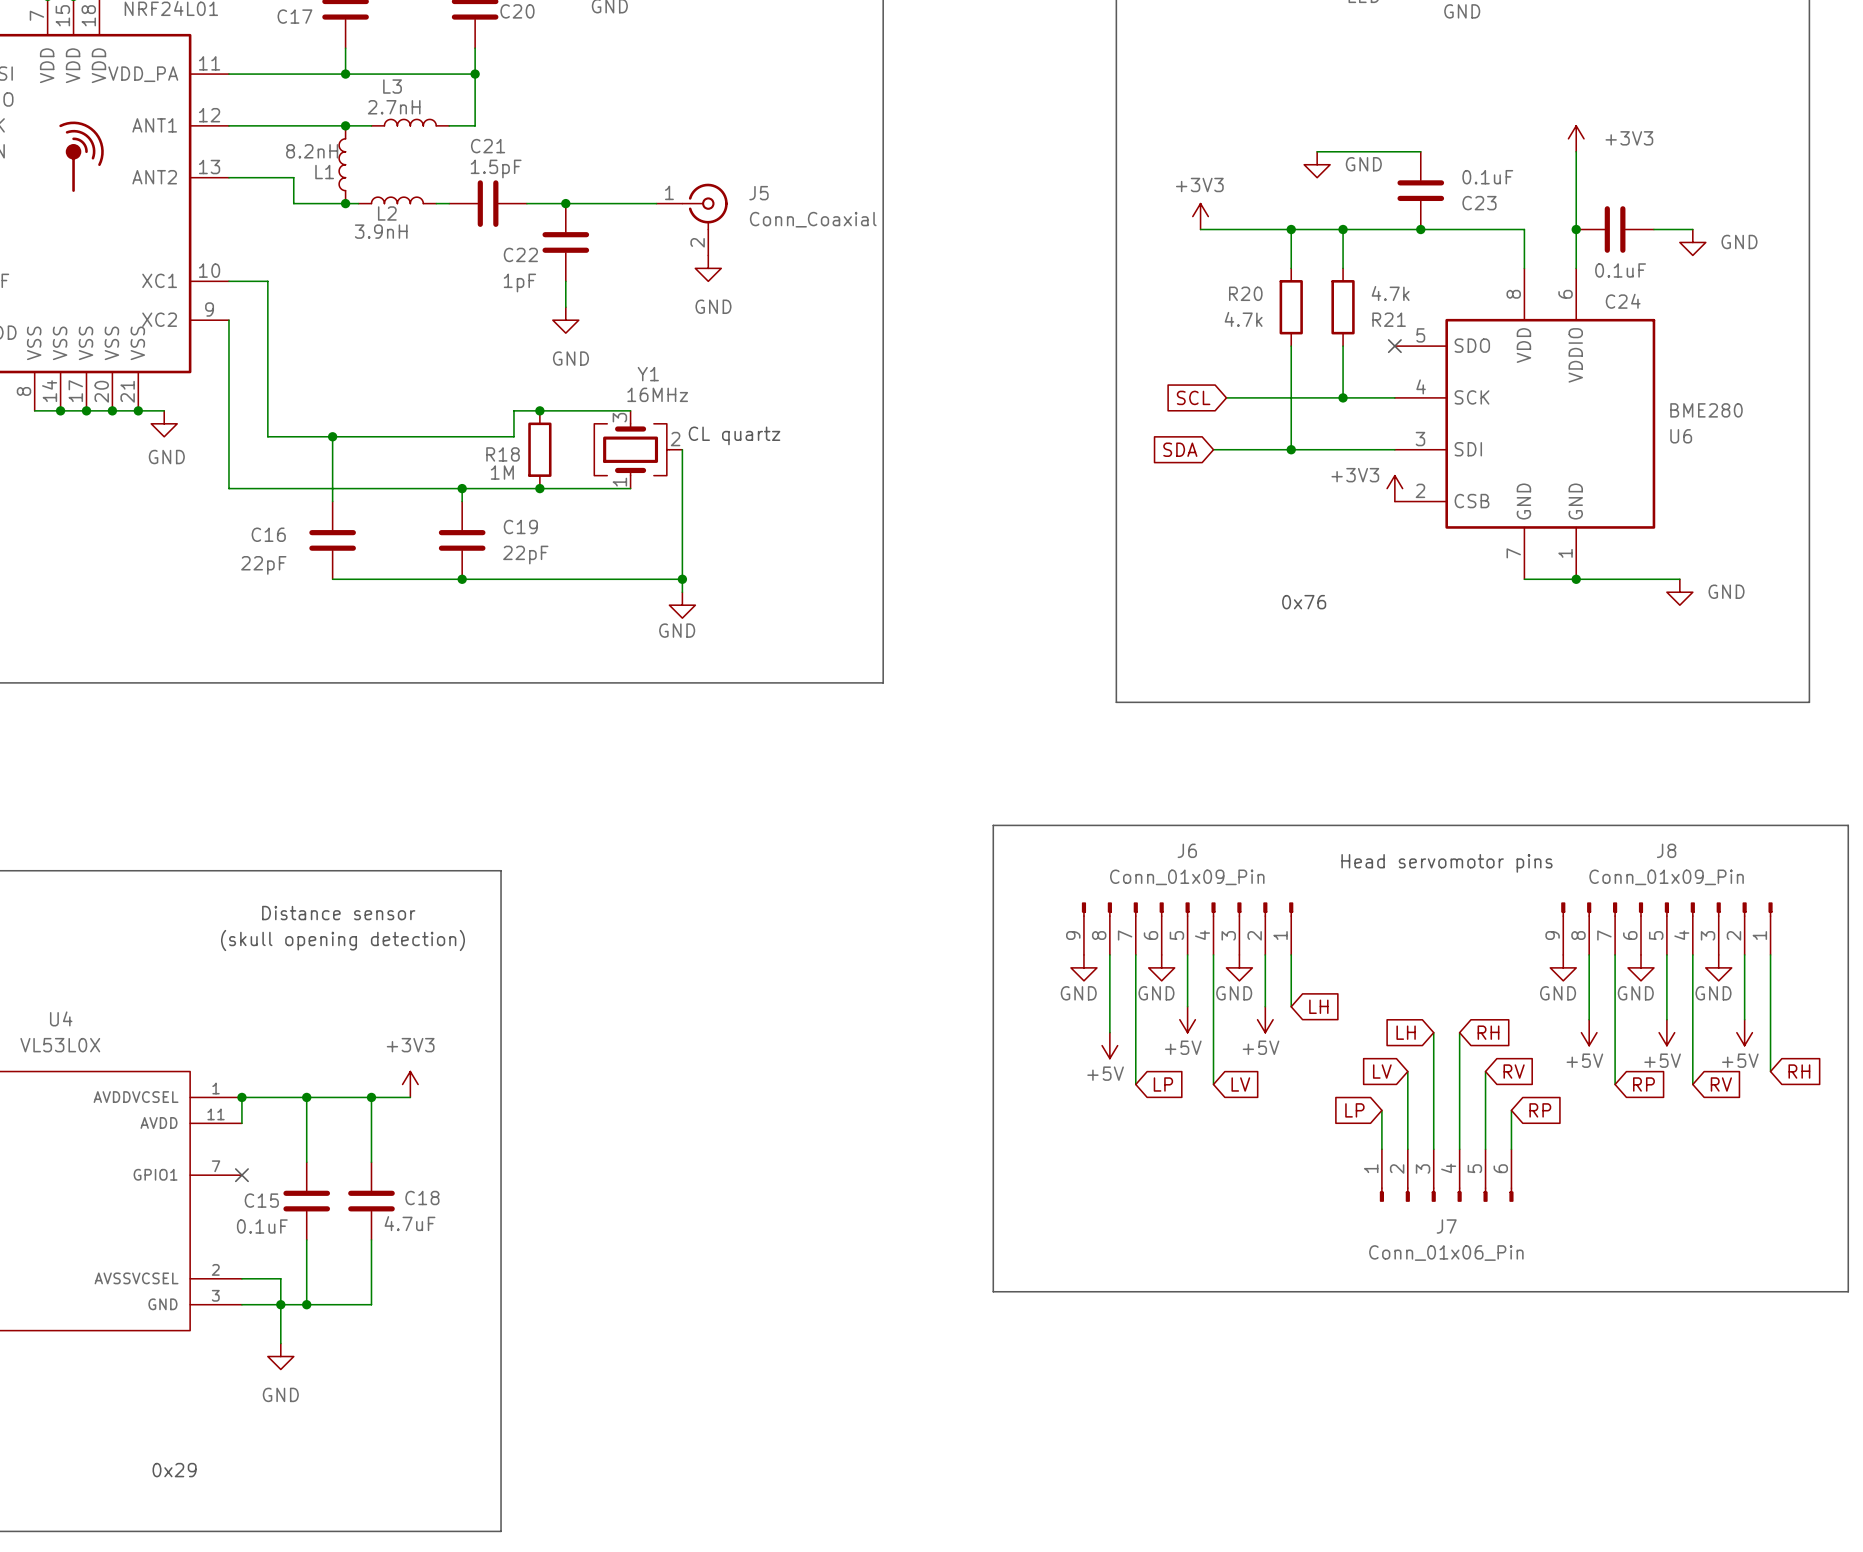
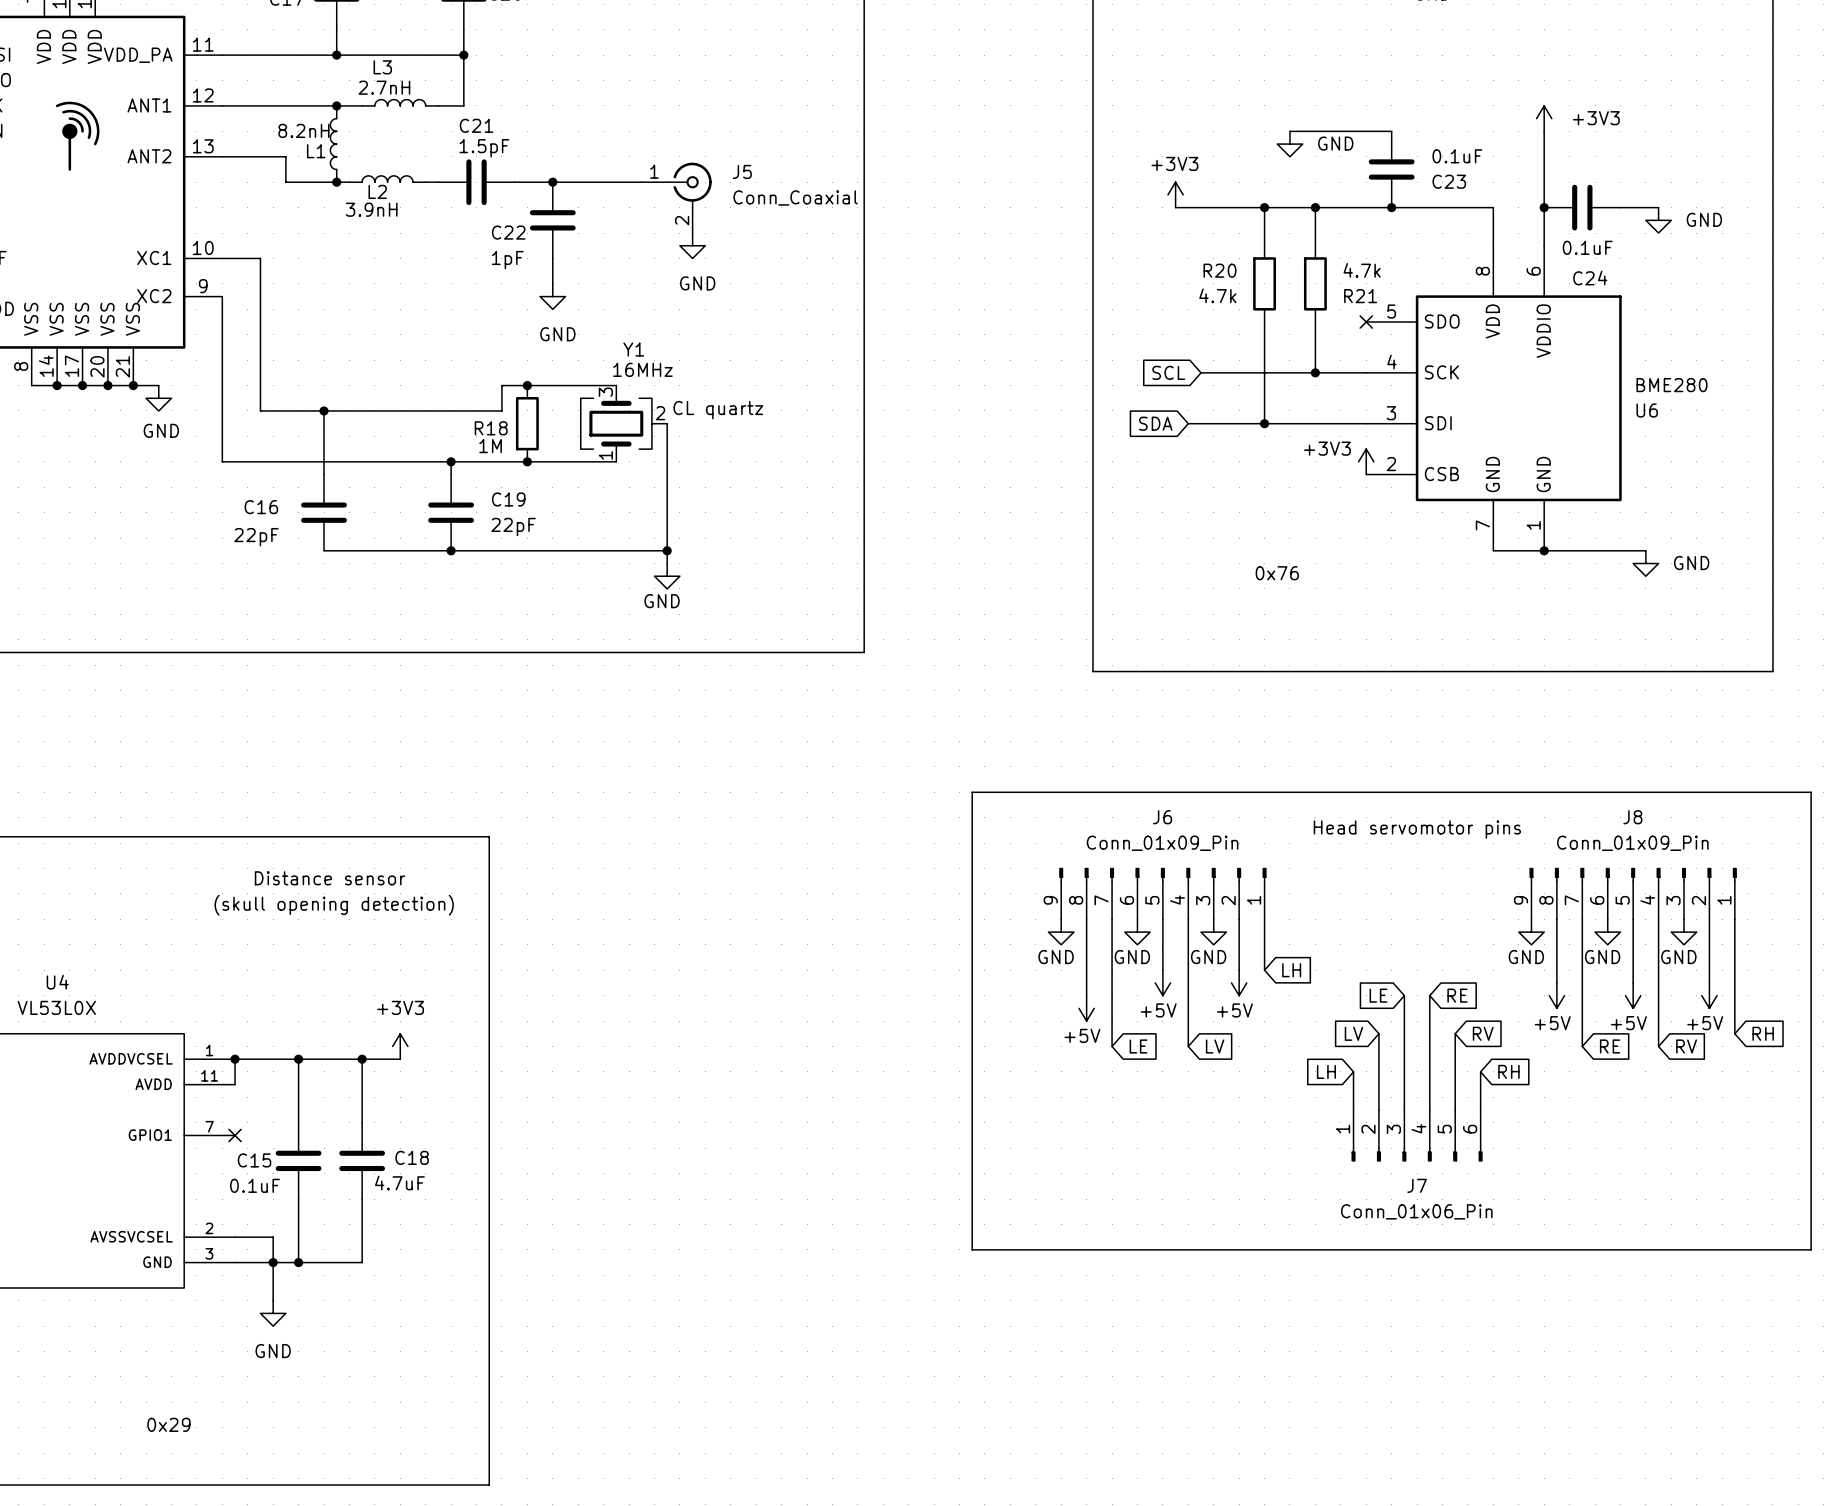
global label: LH (1406, 1032) -> LE (1378, 995)
global label: RH (1488, 1032) -> RE (1457, 995)
global label: LP (1163, 1084) -> LE (1138, 1046)
global label: RP (1643, 1084) -> RE (1610, 1046)
global label: LP (1354, 1110) -> LH (1326, 1071)
global label: RP (1540, 1110) -> RH (1508, 1071)

